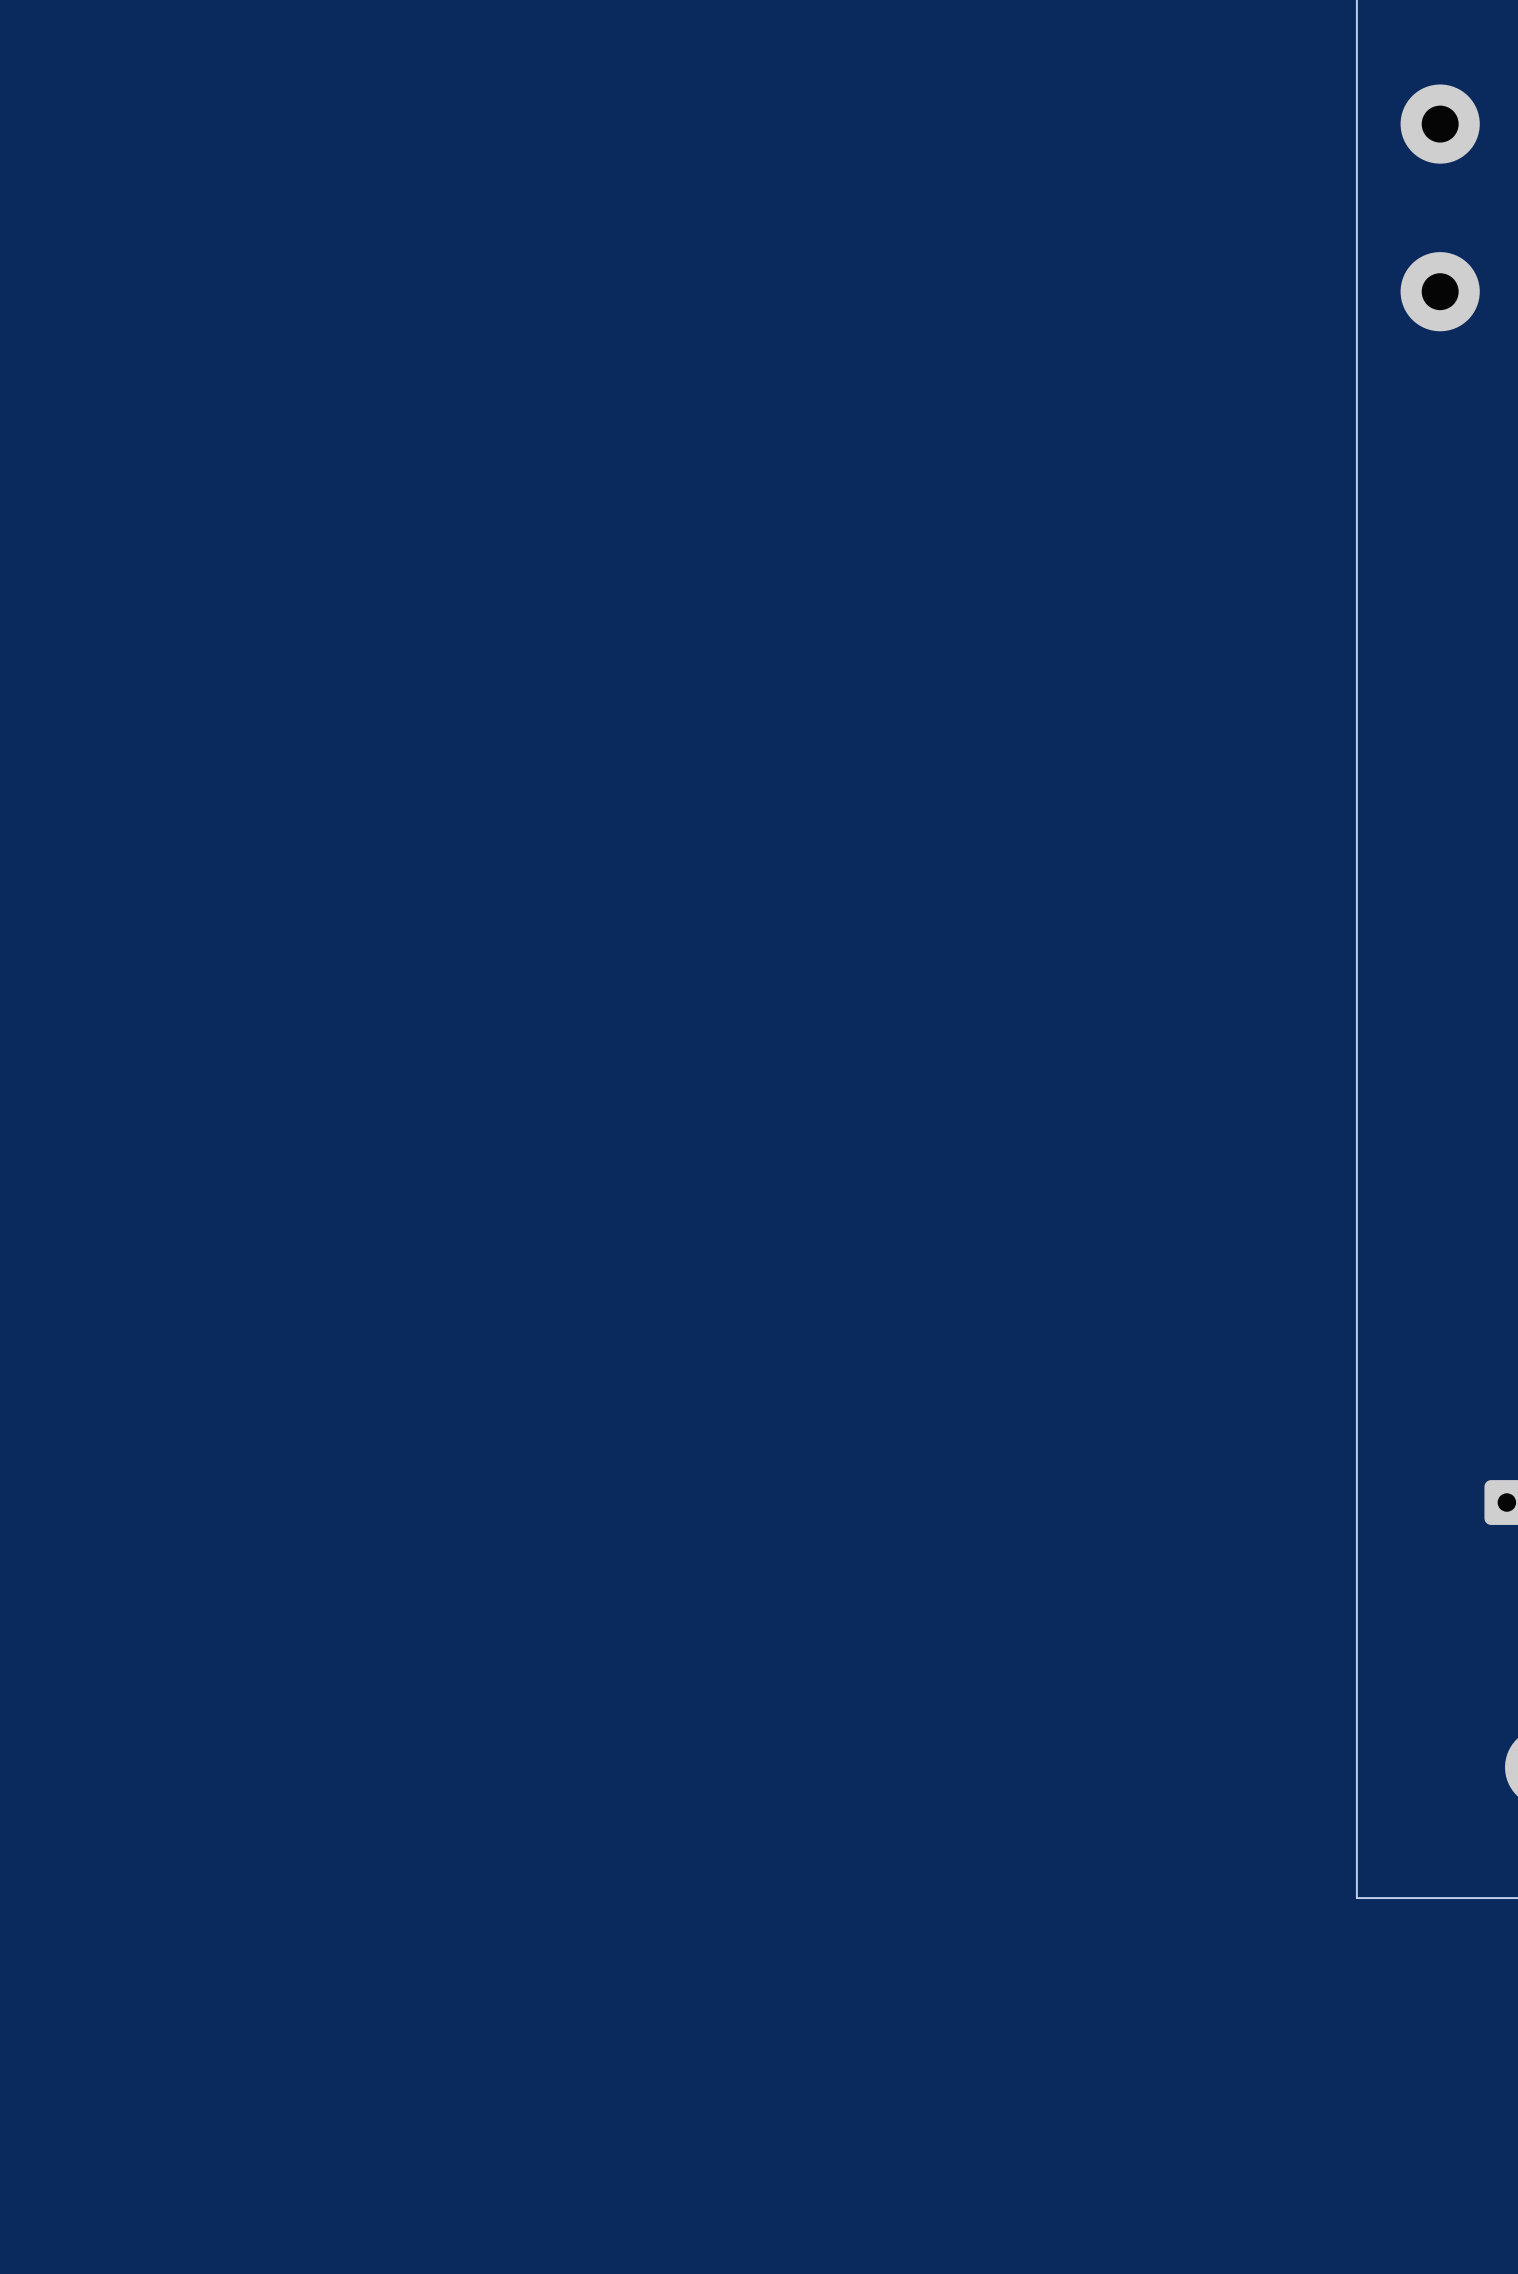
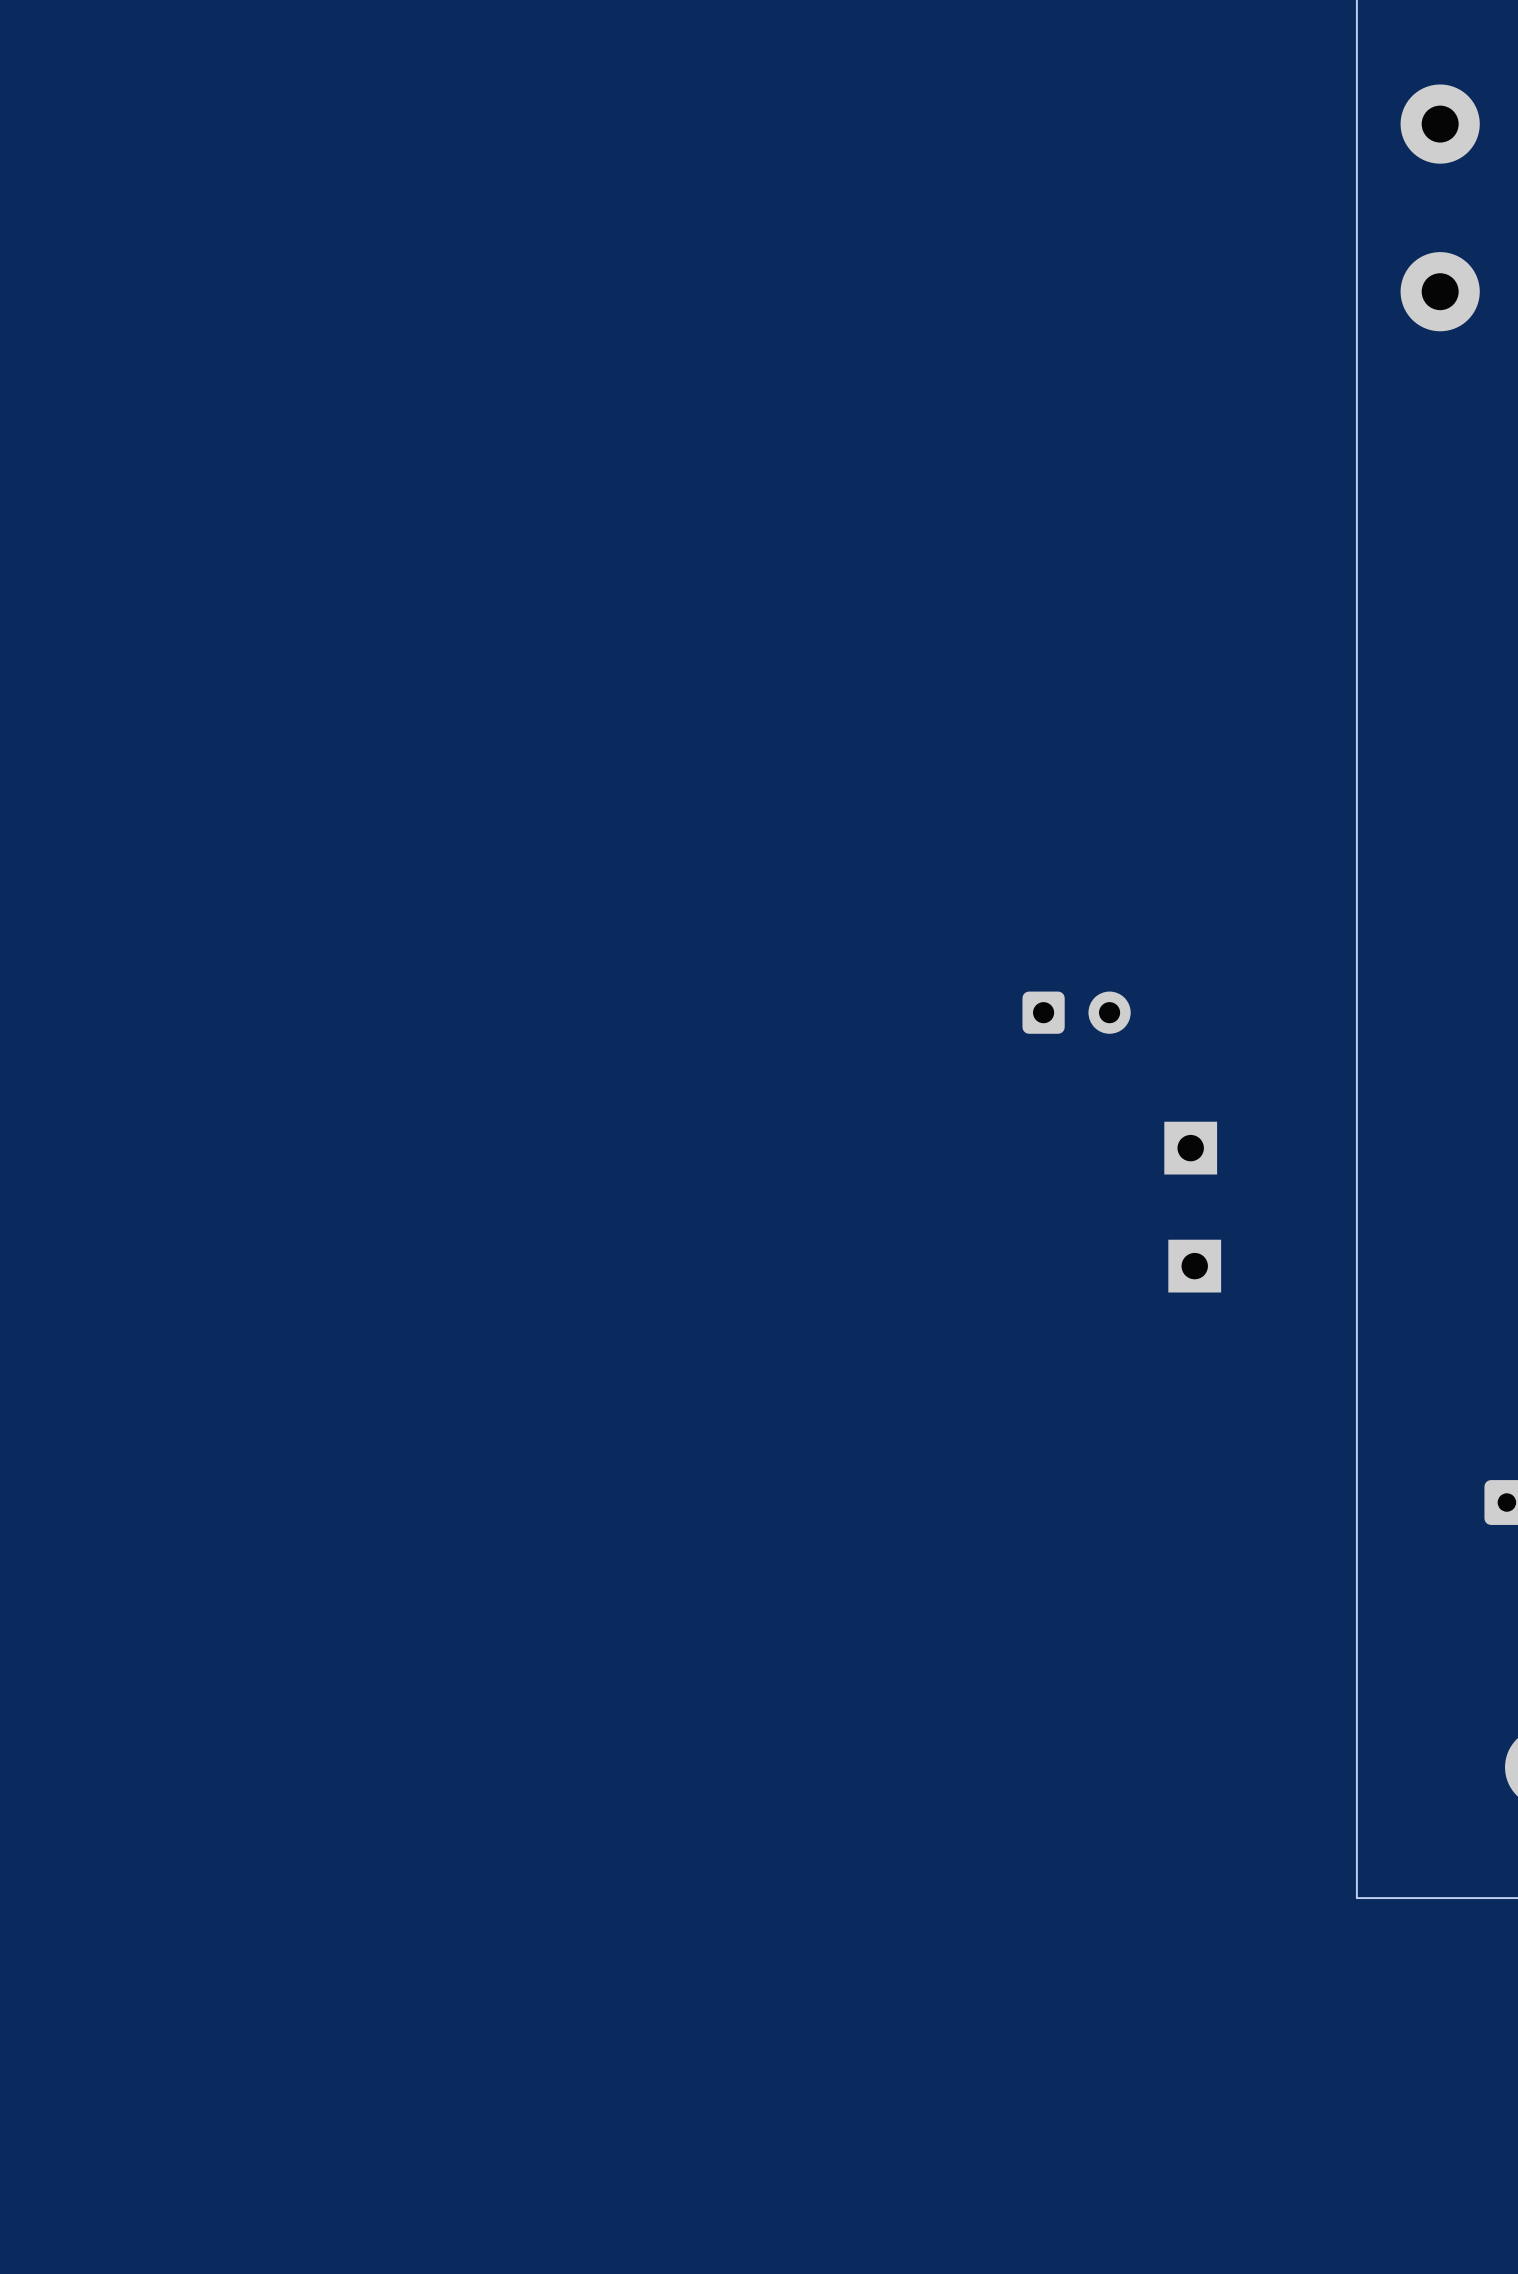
part: none -> (1076, 1012)
part: none -> (1190, 1148)
part: none -> (1194, 1266)

